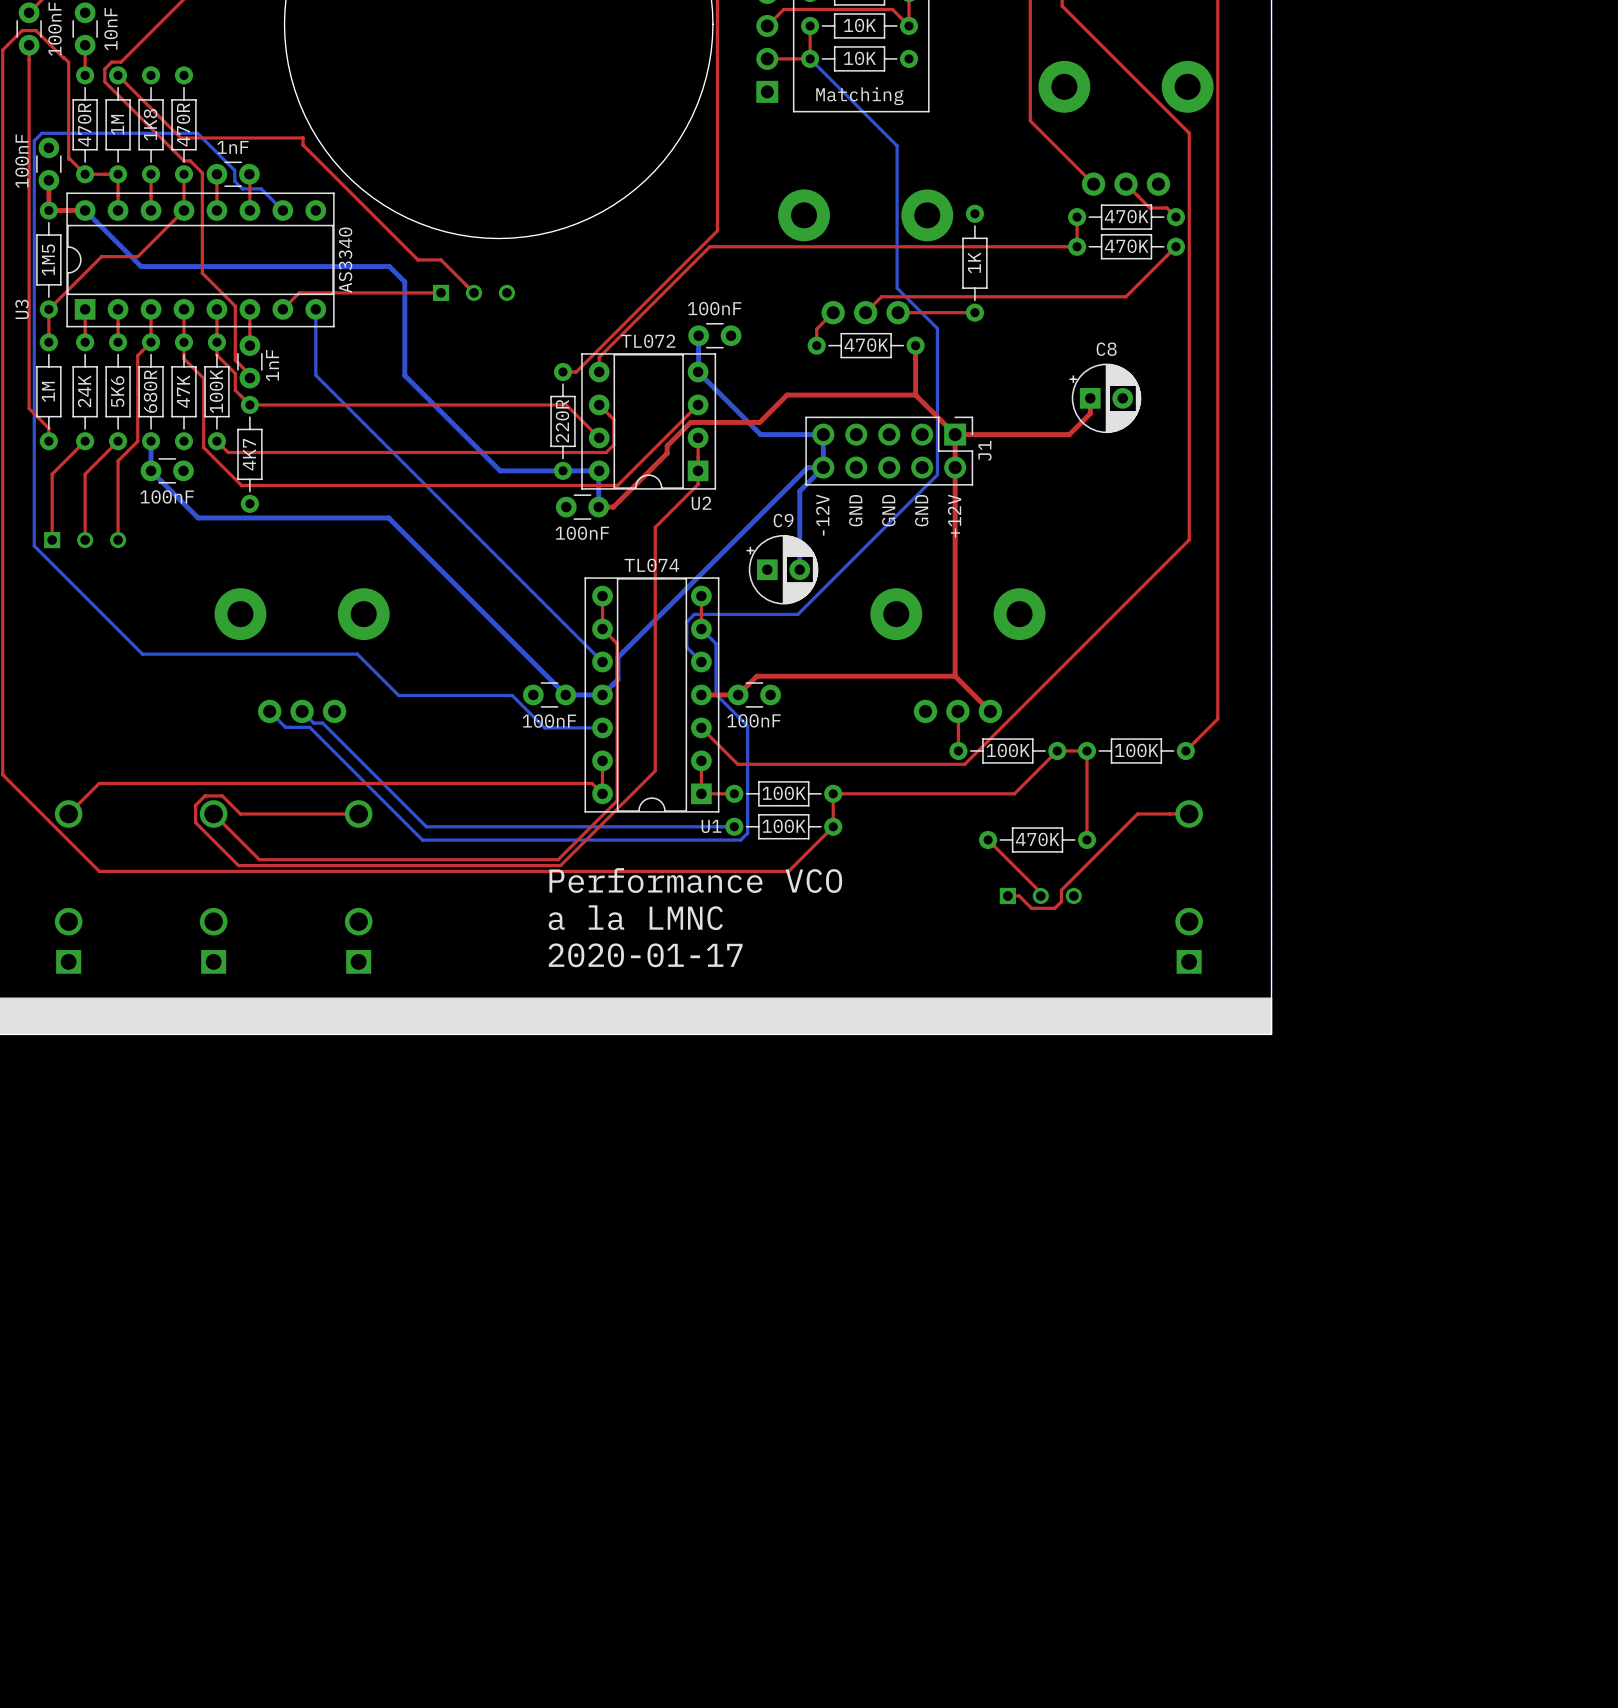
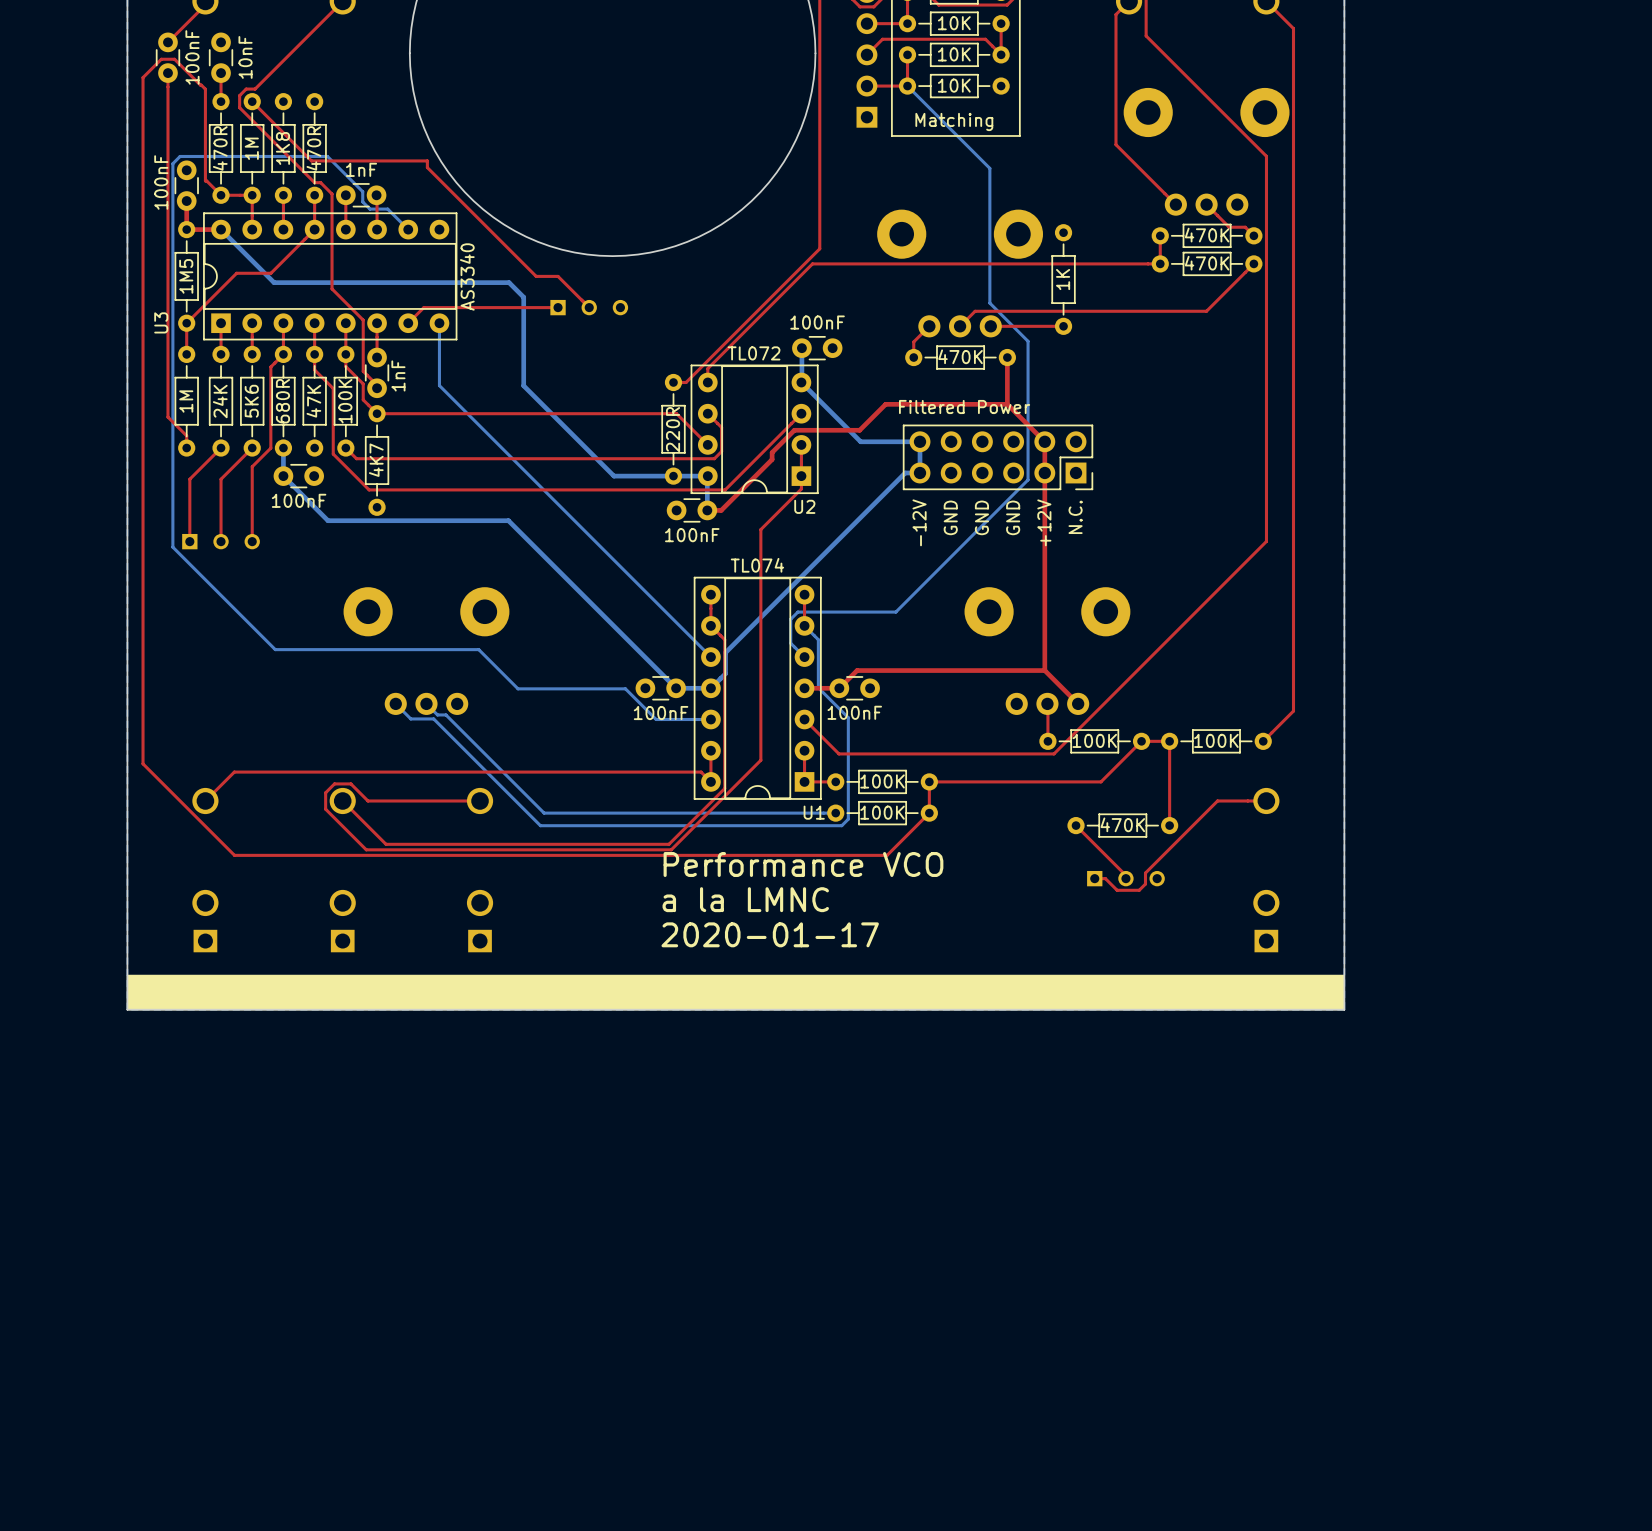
top track: (1090, 398) (1090, 413) (1069, 434) (955, 434) -> none
C8: (1105, 398) -> none
J1: (889, 451) -> none
part: none -> Filtered Power (998, 457)
bottom track: (823, 467) (799, 491) (799, 569) -> none
text: none -> N.C. (1075, 517)
C9: (782, 569) -> none

